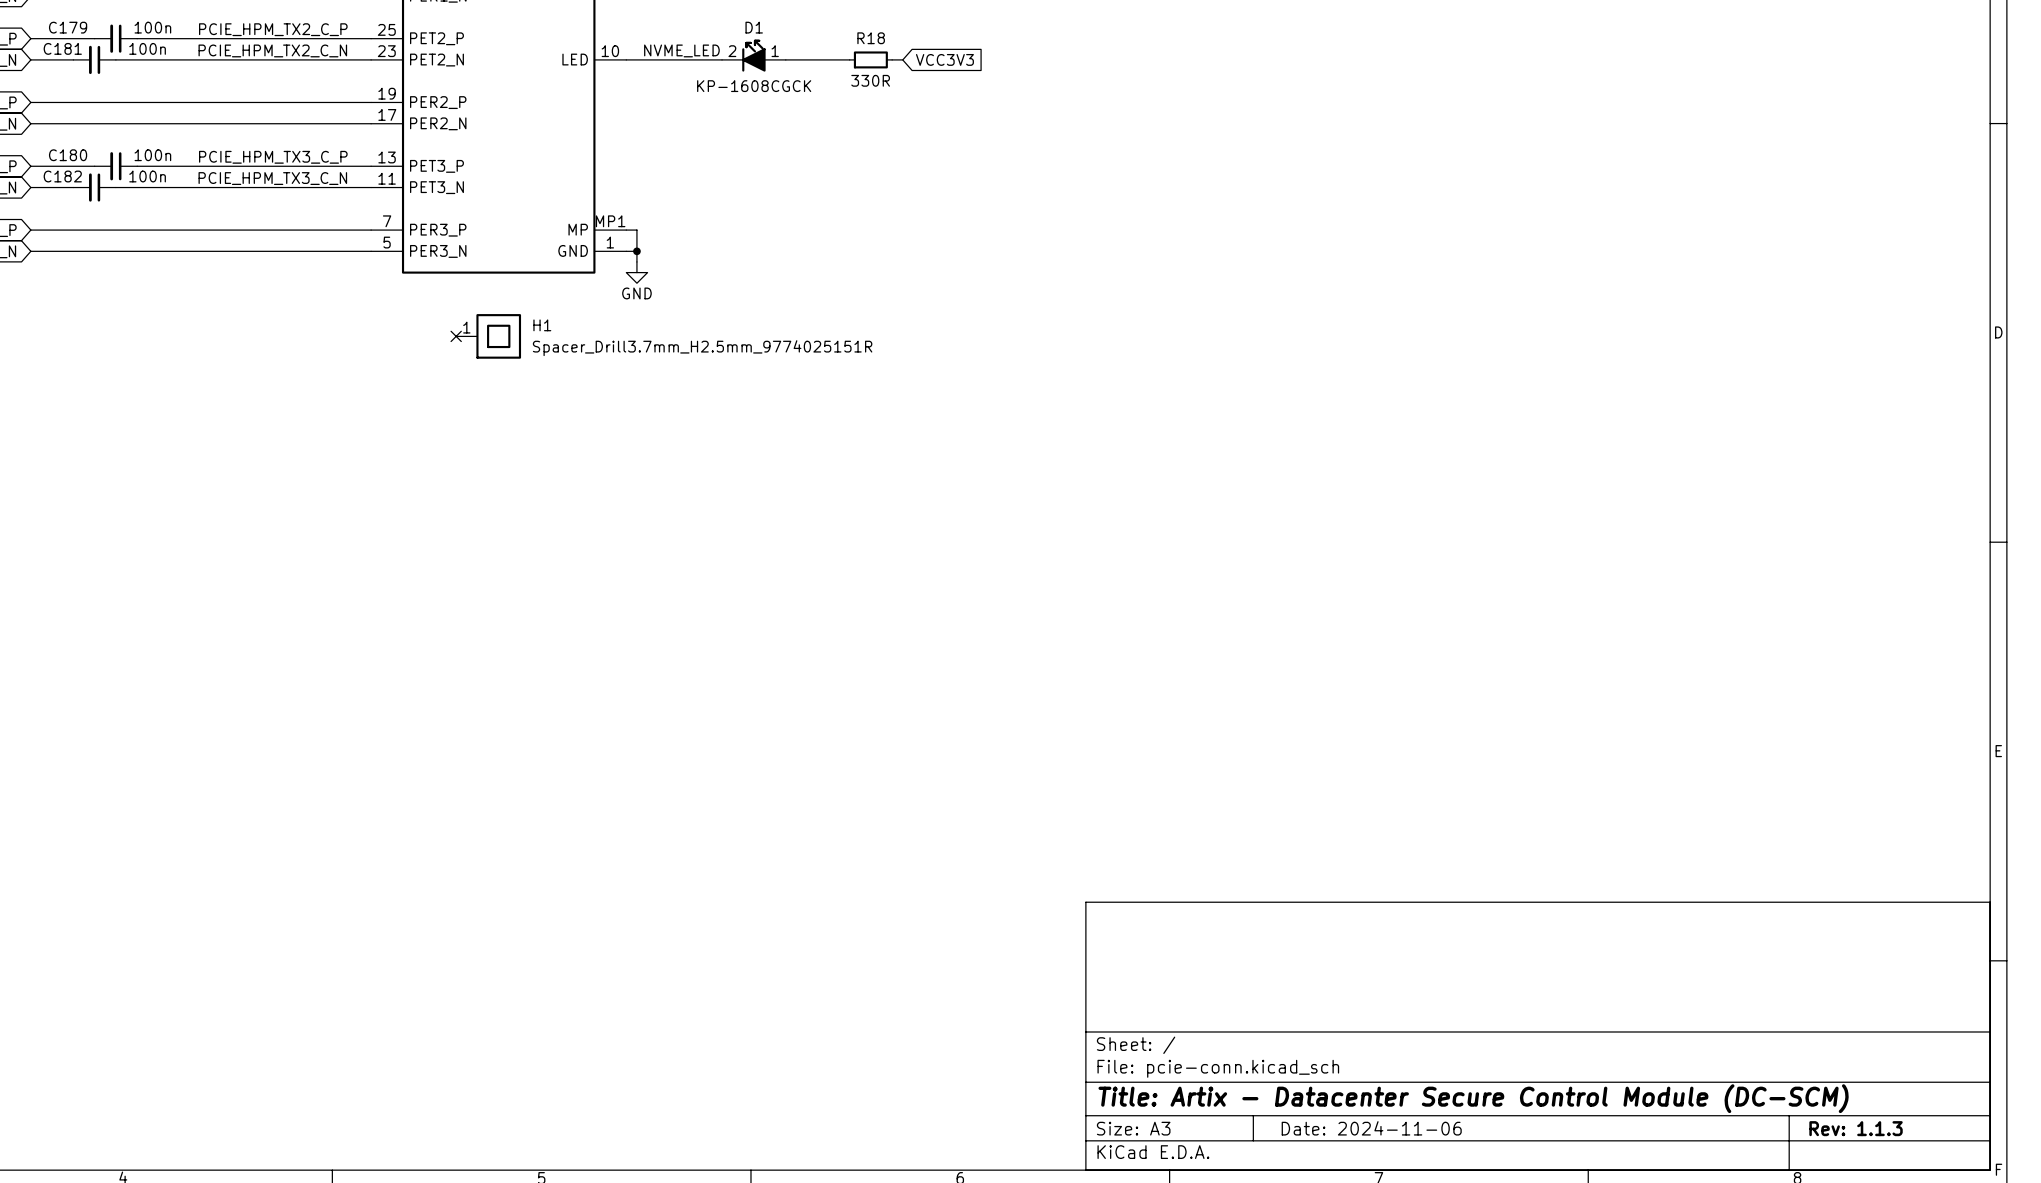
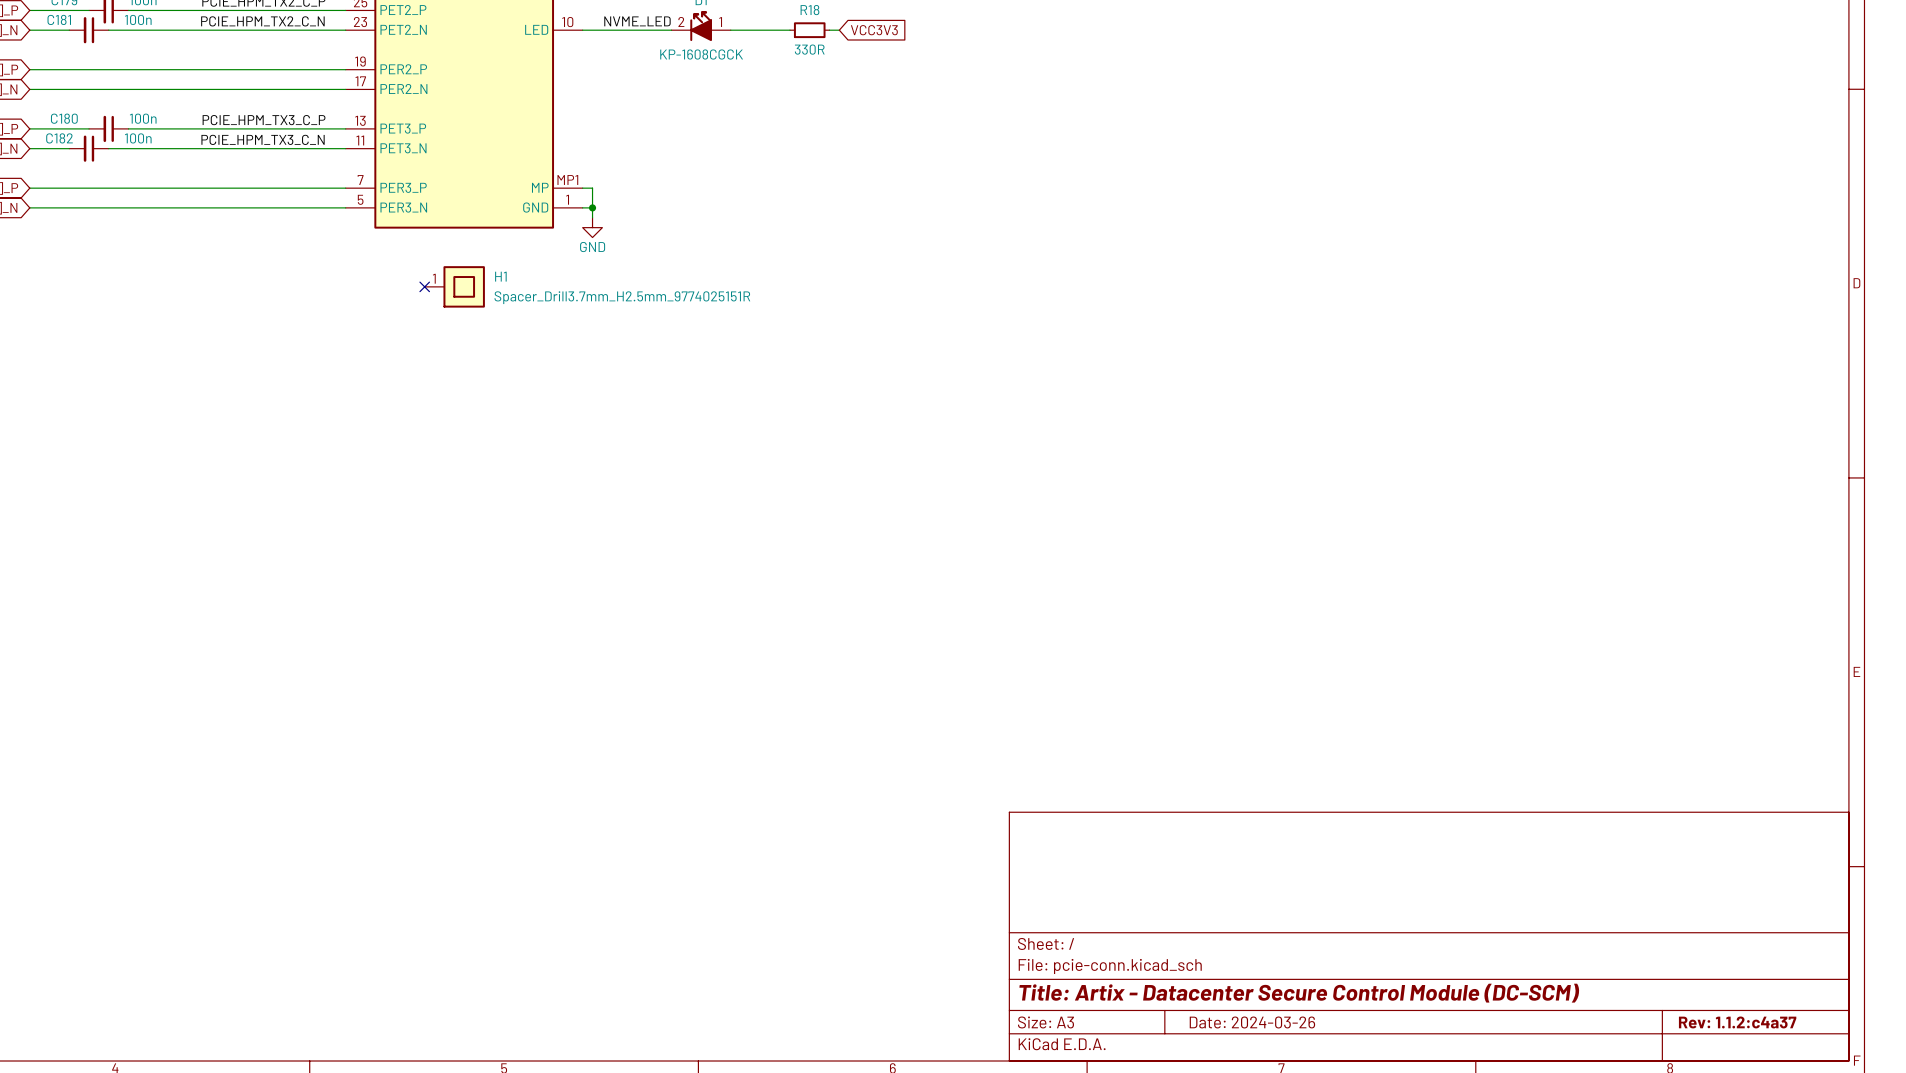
title block: Date: 2024-11-06 (1371, 1128) -> Date: 2024-03-26 (1252, 1022)
title block: Rev: 1.1.3 (1856, 1128) -> Rev: 1.1.2:c4a37 (1737, 1022)

